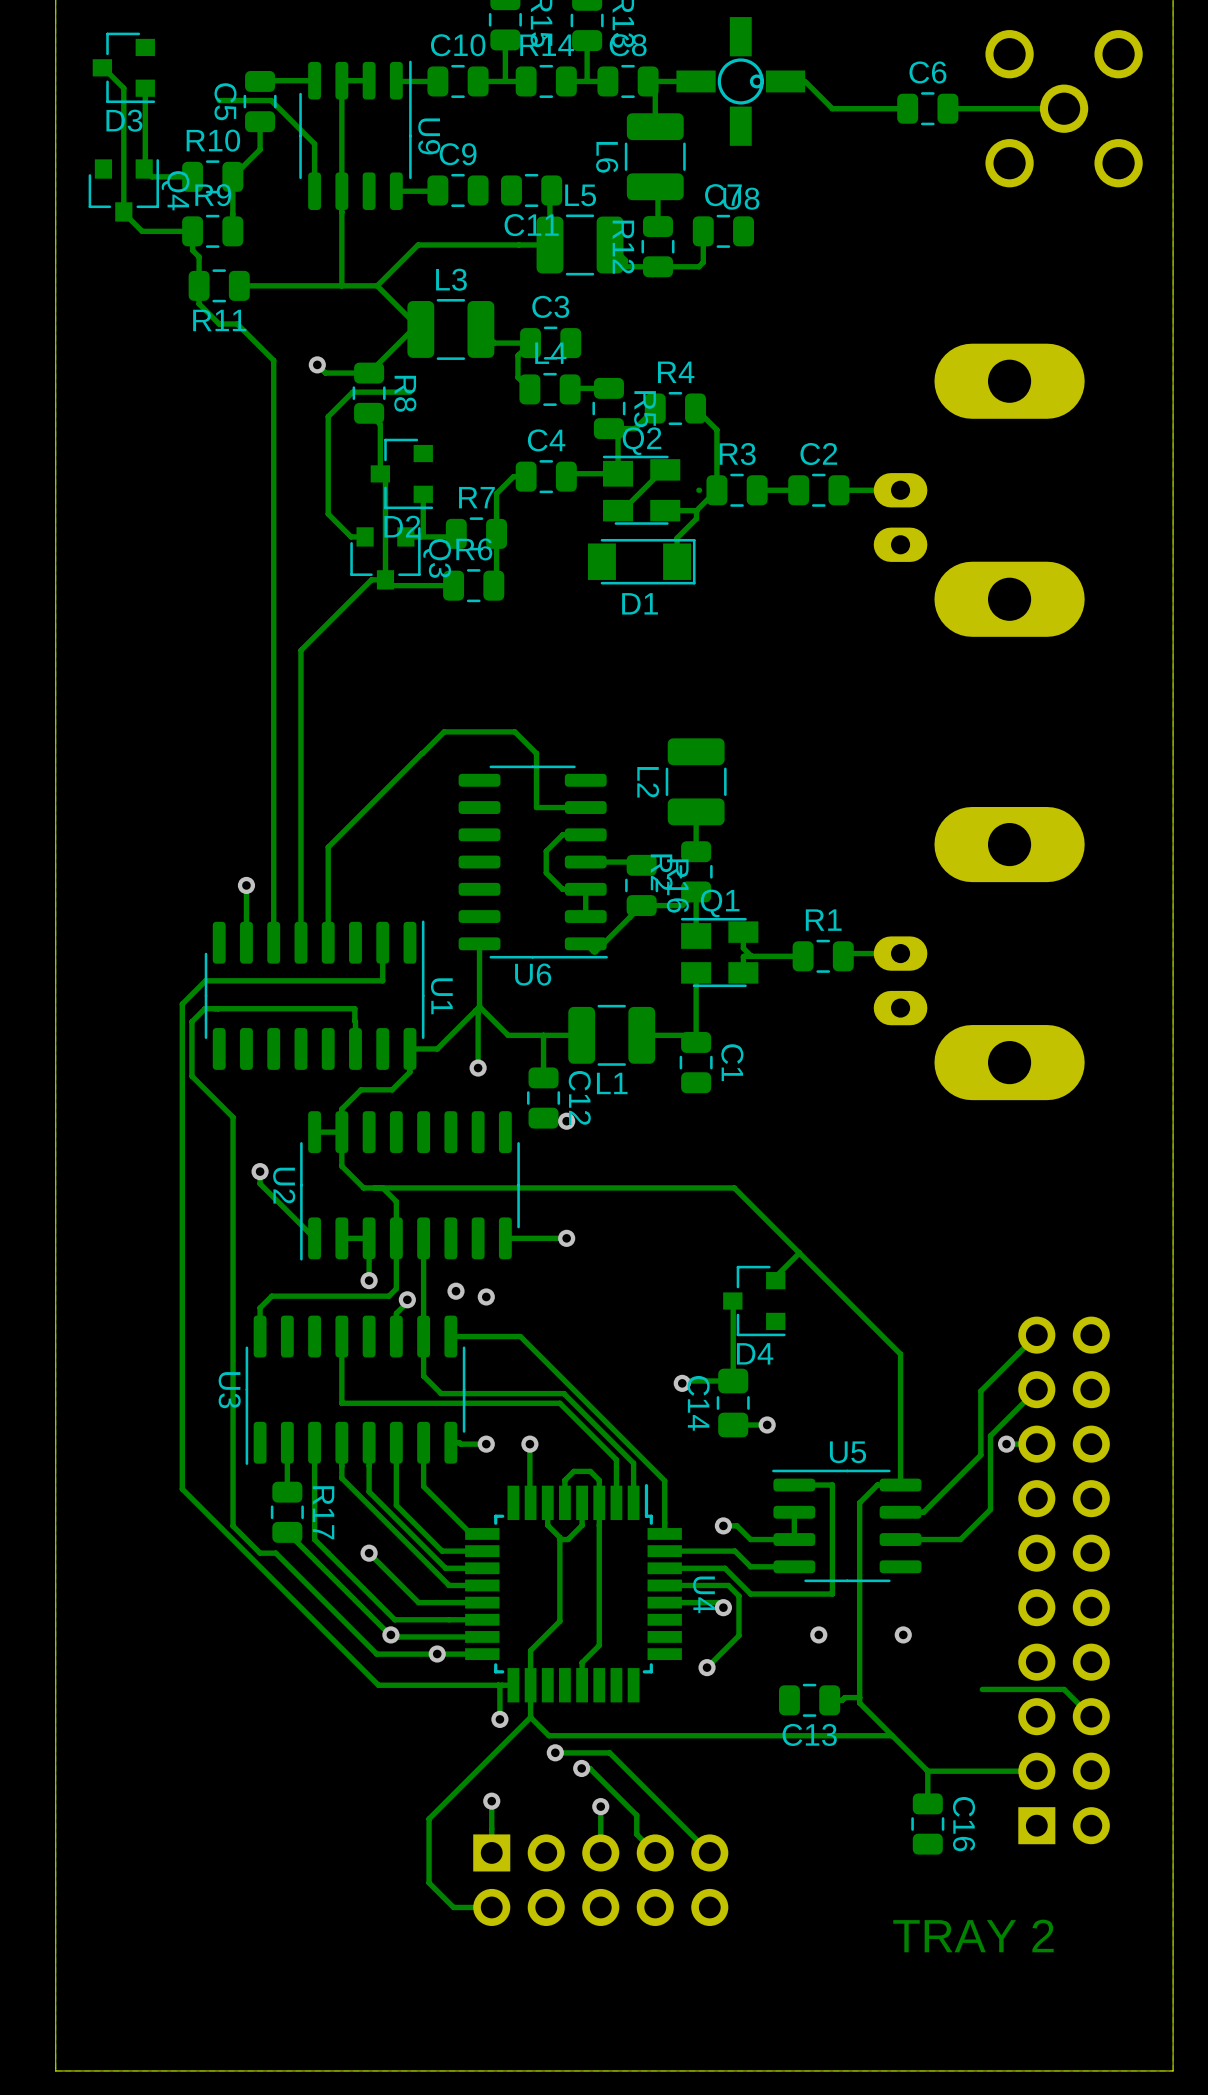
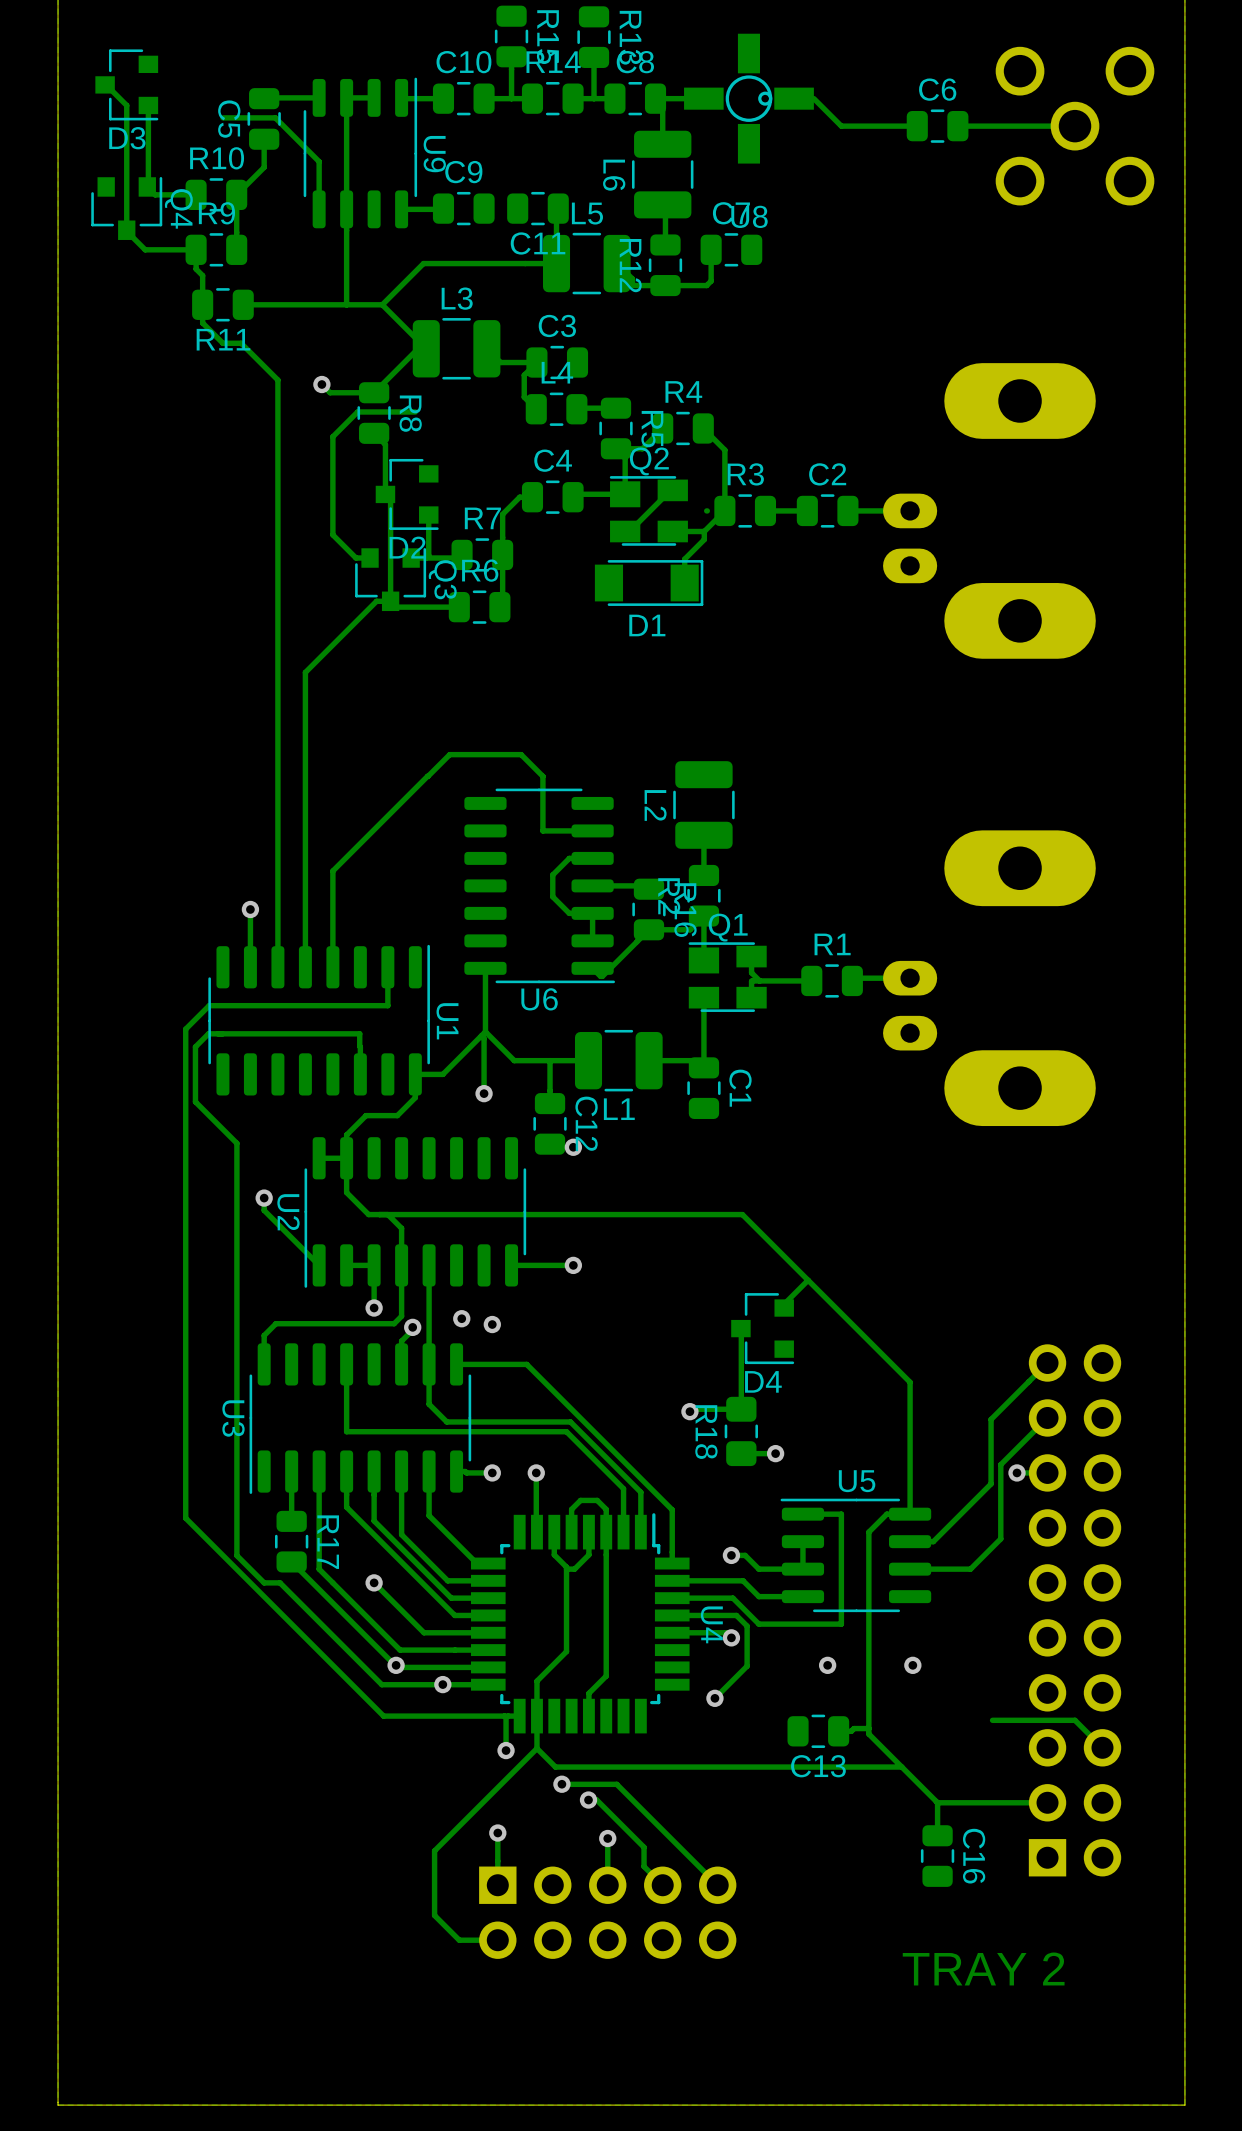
C14 name: C14 (698, 1403) -> R18 (706, 1432)

